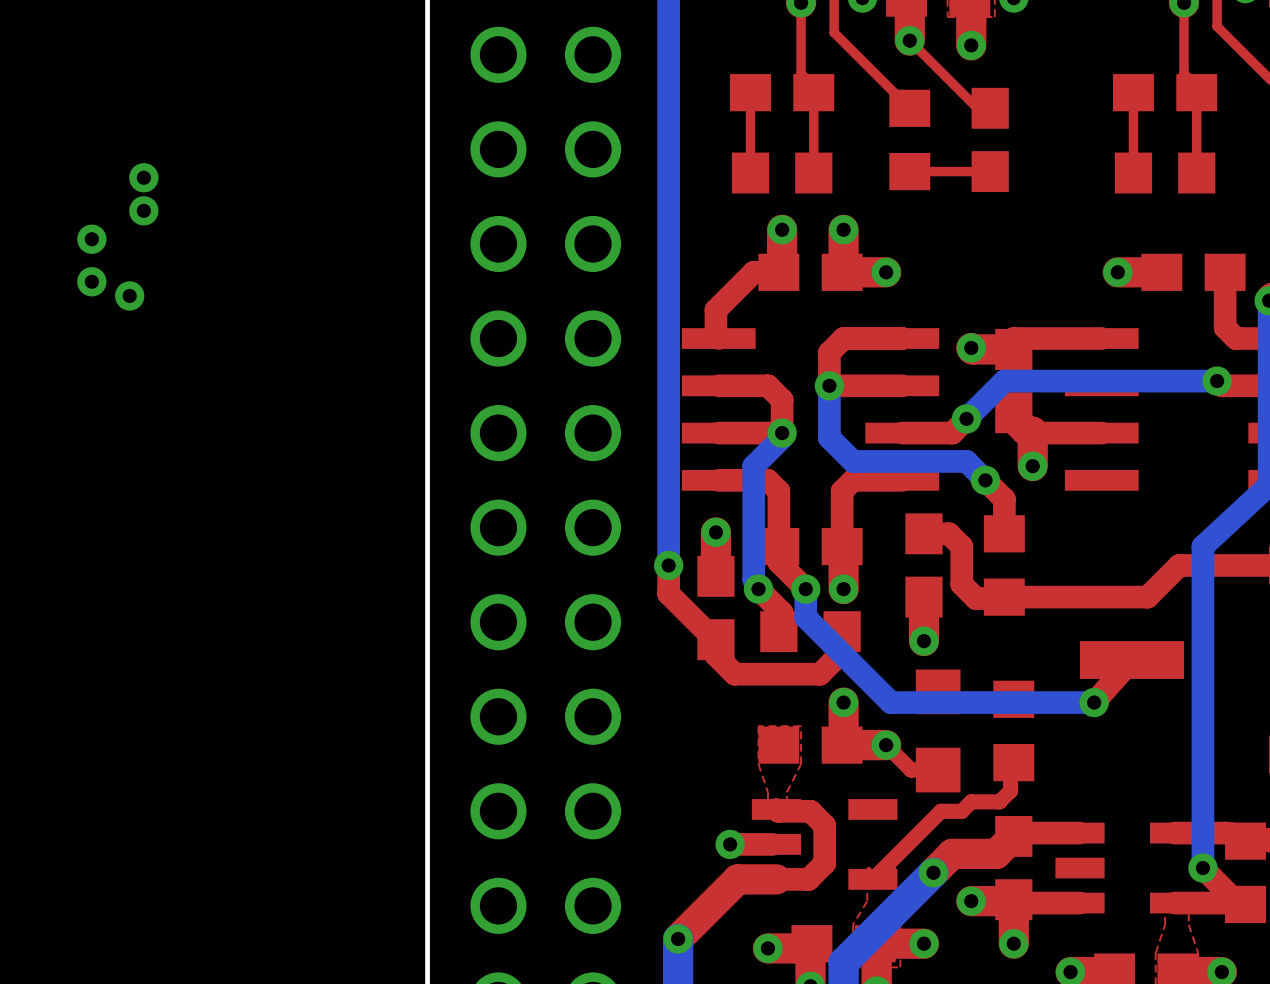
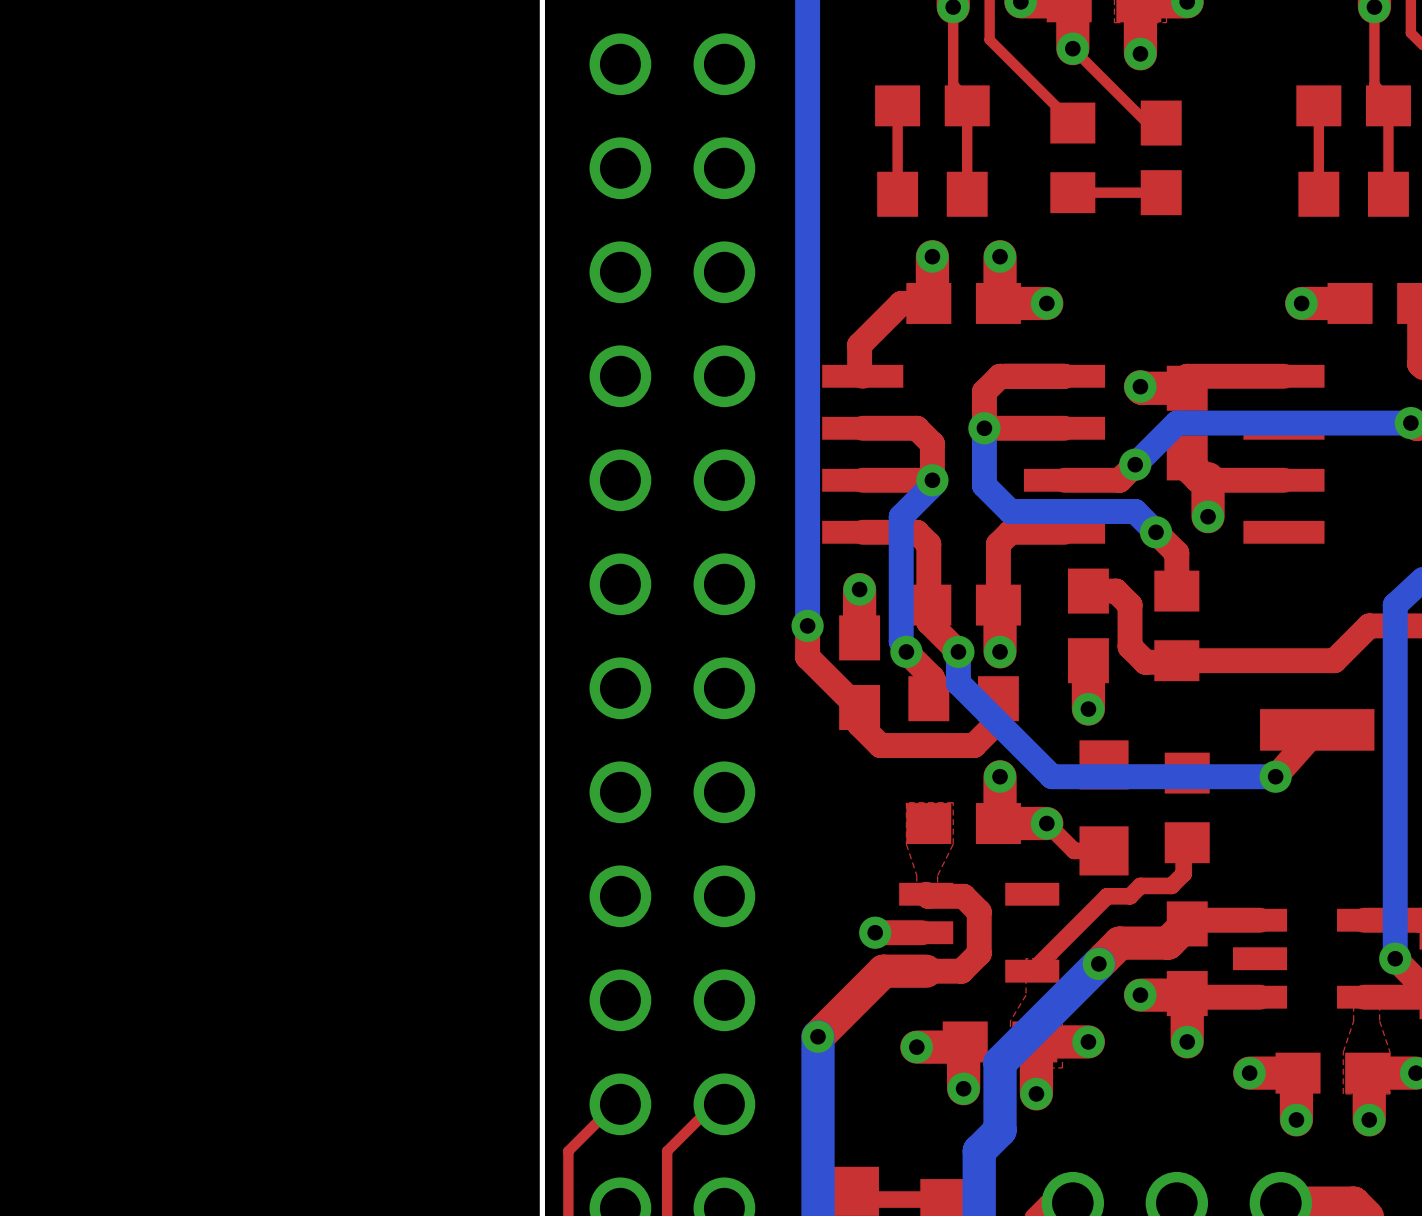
via: (143, 177) -> none
via: (143, 210) -> none
via: (91, 239) -> none
via: (91, 281) -> none
via: (129, 295) -> none

